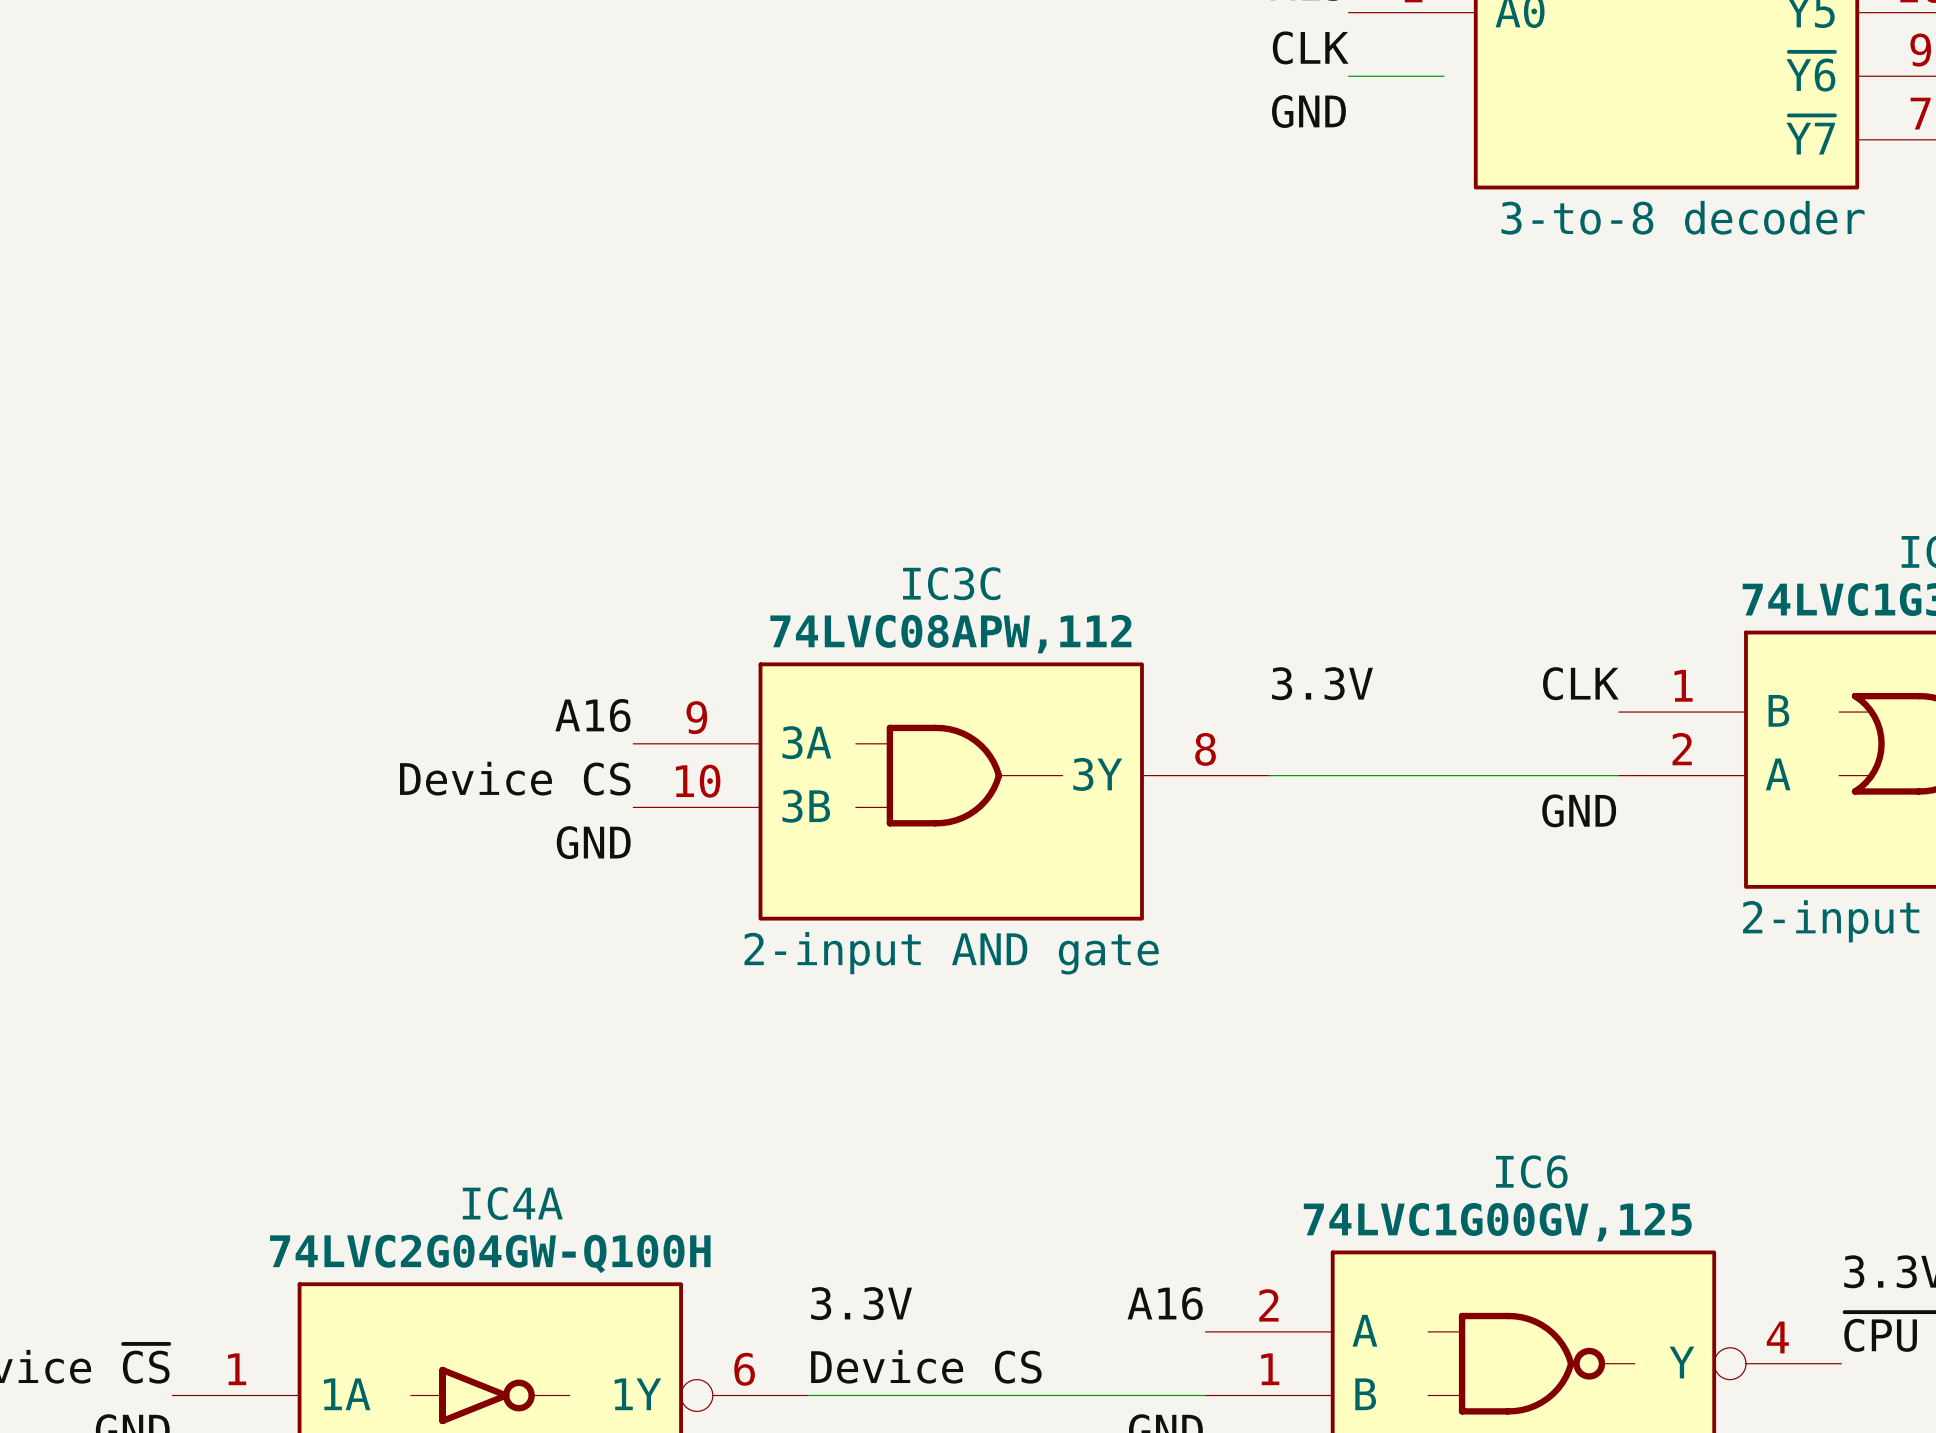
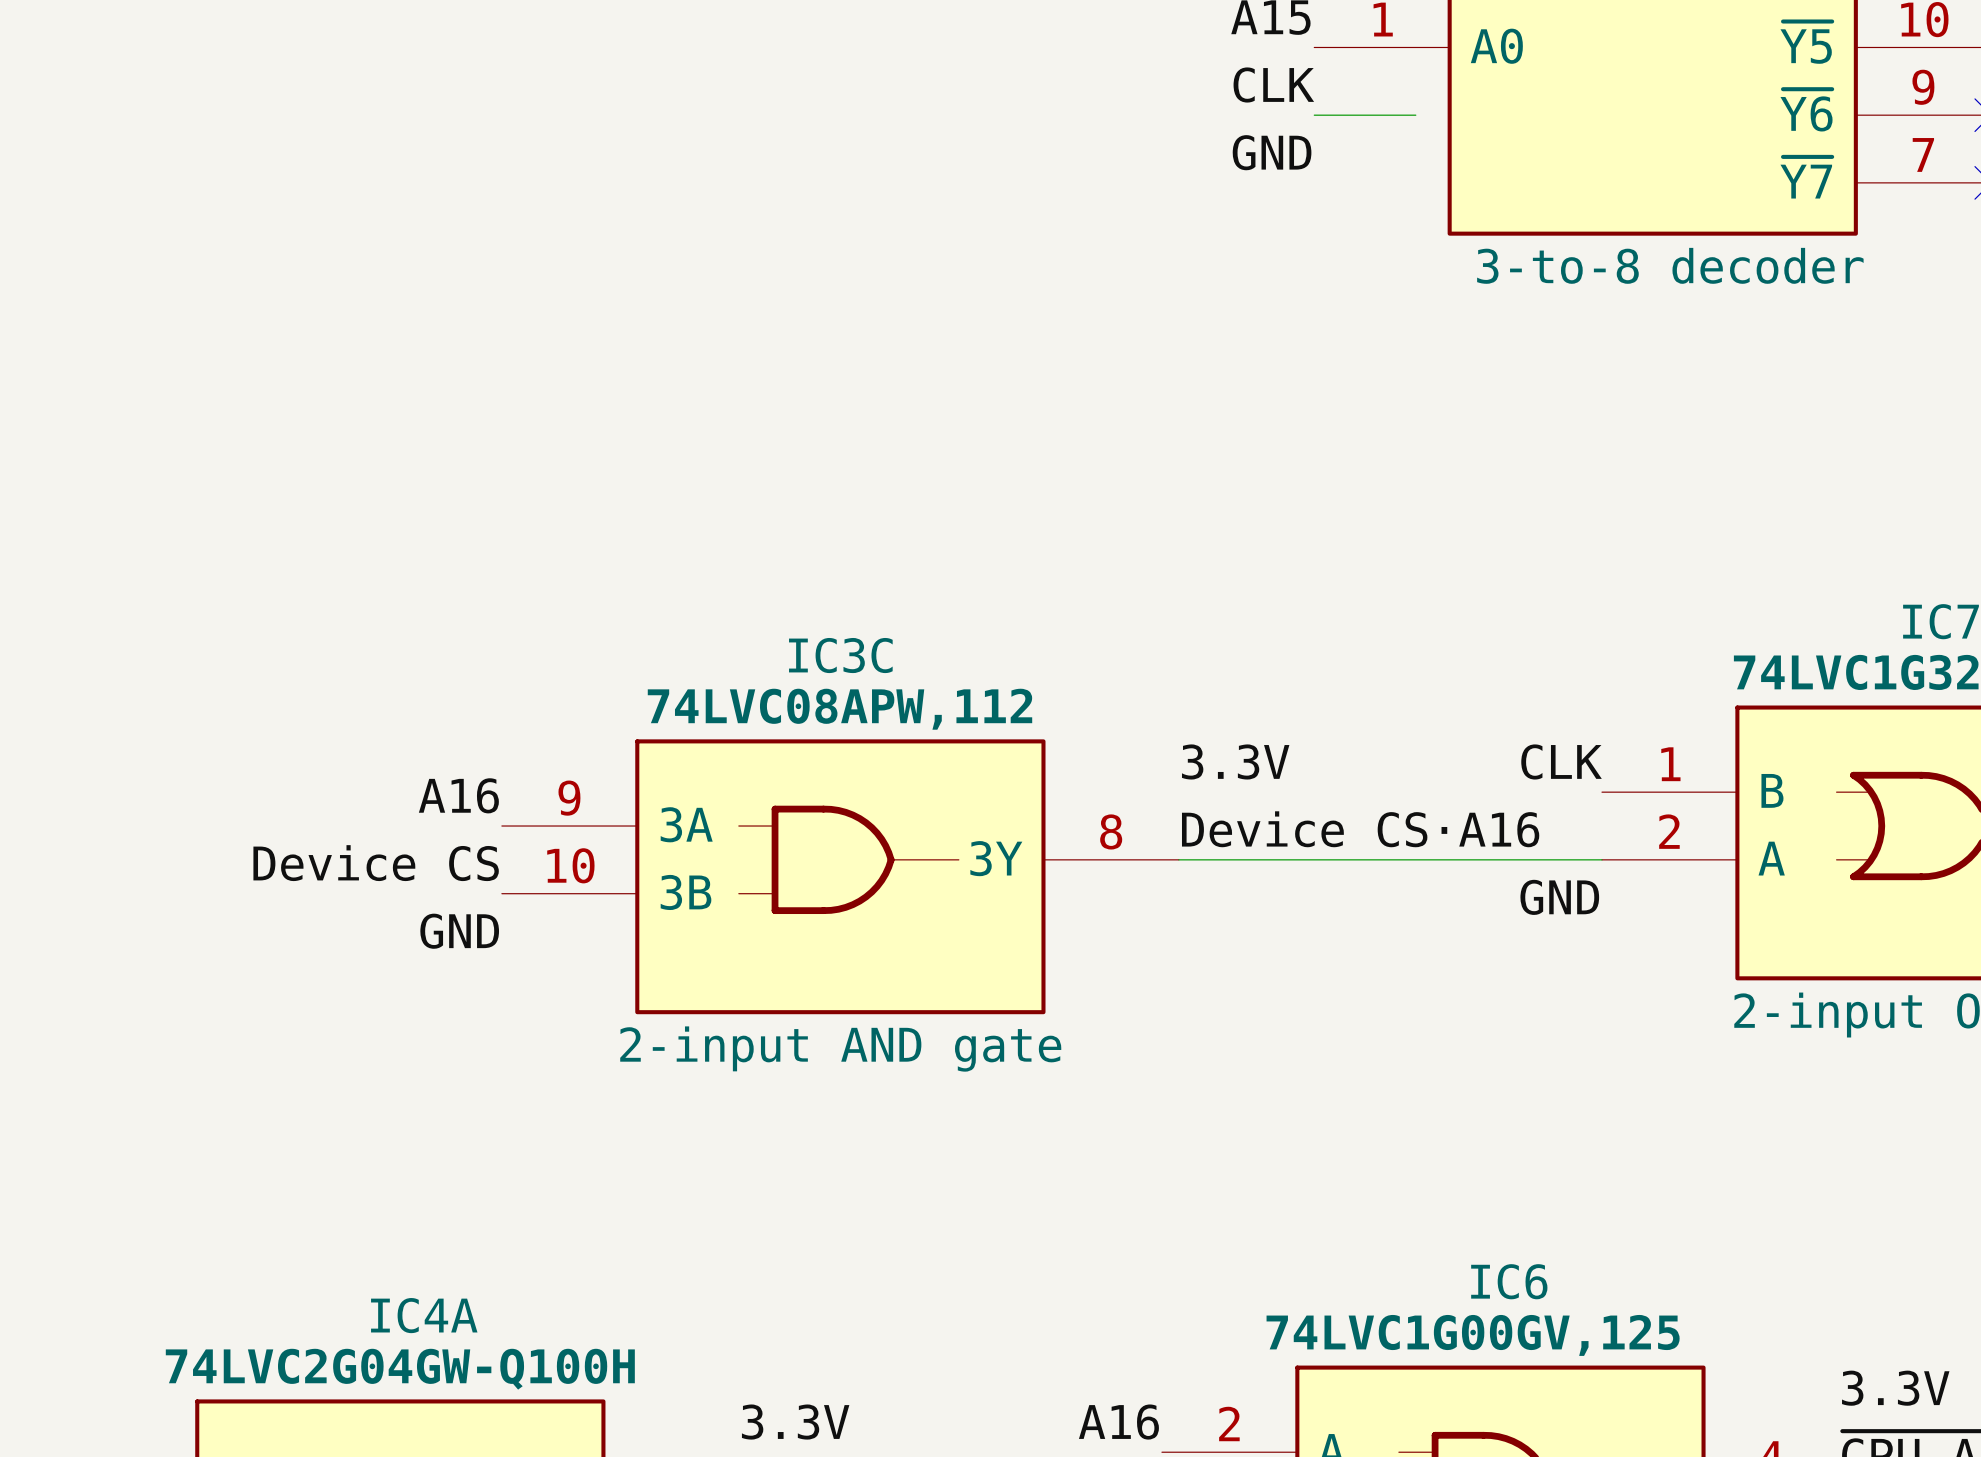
label position: 3.3V (1322, 683) -> 3.3V (1235, 761)
label position: A16 (592, 715) -> A16 (458, 795)
label: none -> Device CS·A16 (1360, 829)
label position: Device CS (515, 778) -> Device CS (376, 863)
IC3C position: (951, 791) -> (840, 876)
label position: GND (593, 842) -> GND (459, 931)

